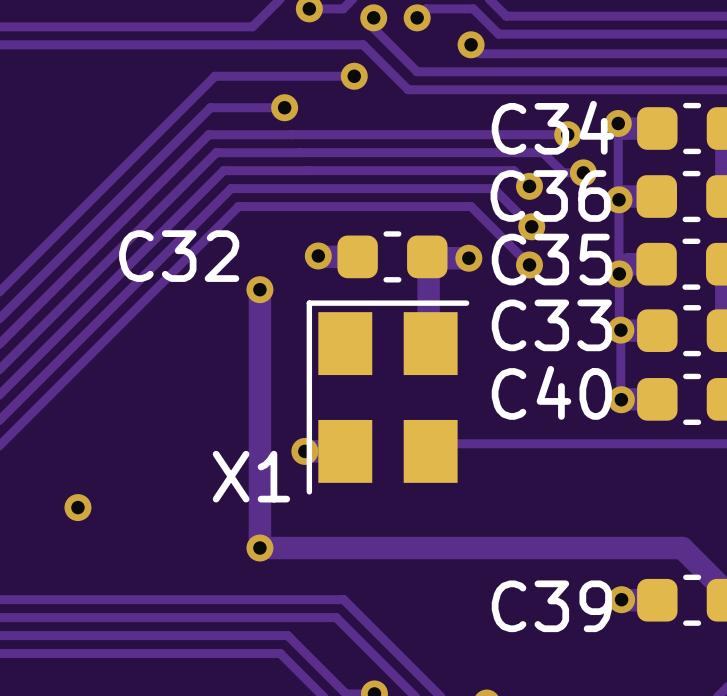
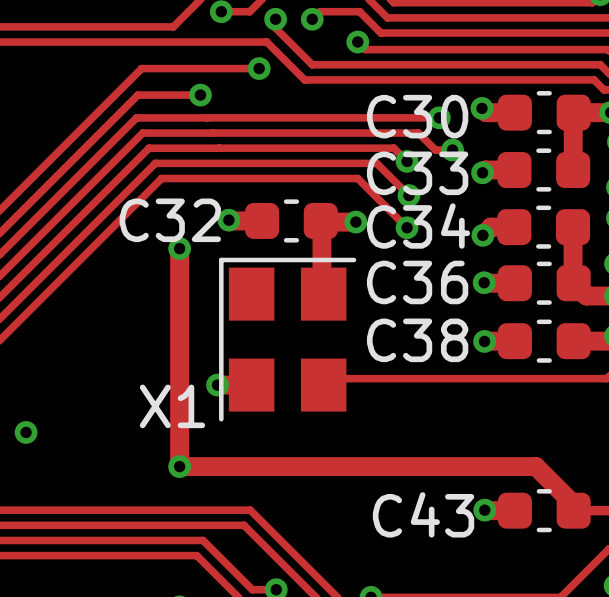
track: (618, 123) (618, 273) -> none
C34 name: C34 (552, 127) -> C30 (417, 116)
C36 name: C36 (550, 196) -> C33 (417, 173)
C32 name position: C32 (179, 256) -> C32 (170, 220)
C35 name: C35 (551, 259) -> C34 (418, 226)
track: (619, 273) (621, 399) -> none
C33 name: C33 (551, 325) -> C36 (417, 282)
C40 name: C40 (551, 392) -> C38 (417, 340)
C39 name: C39 (551, 606) -> C43 (423, 514)

